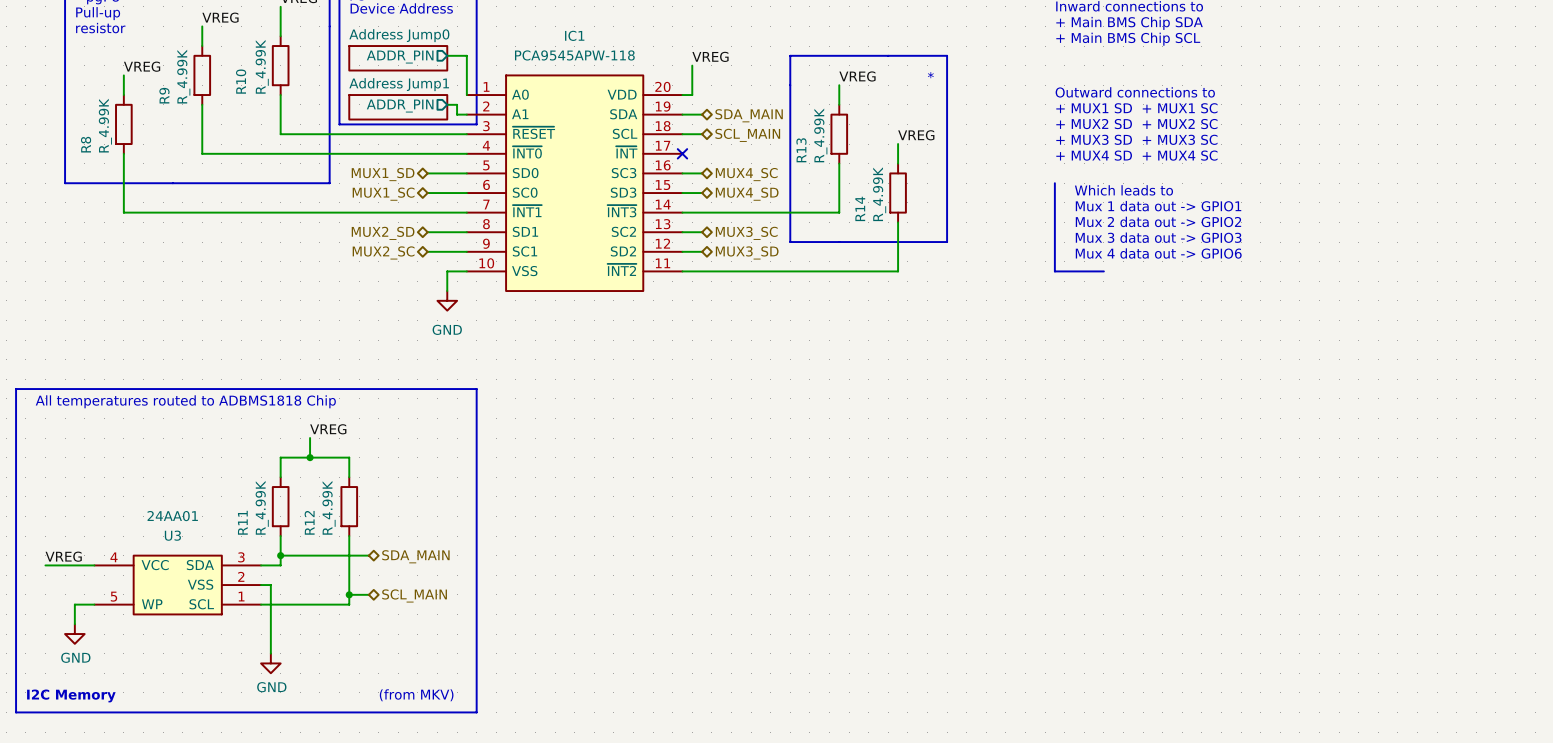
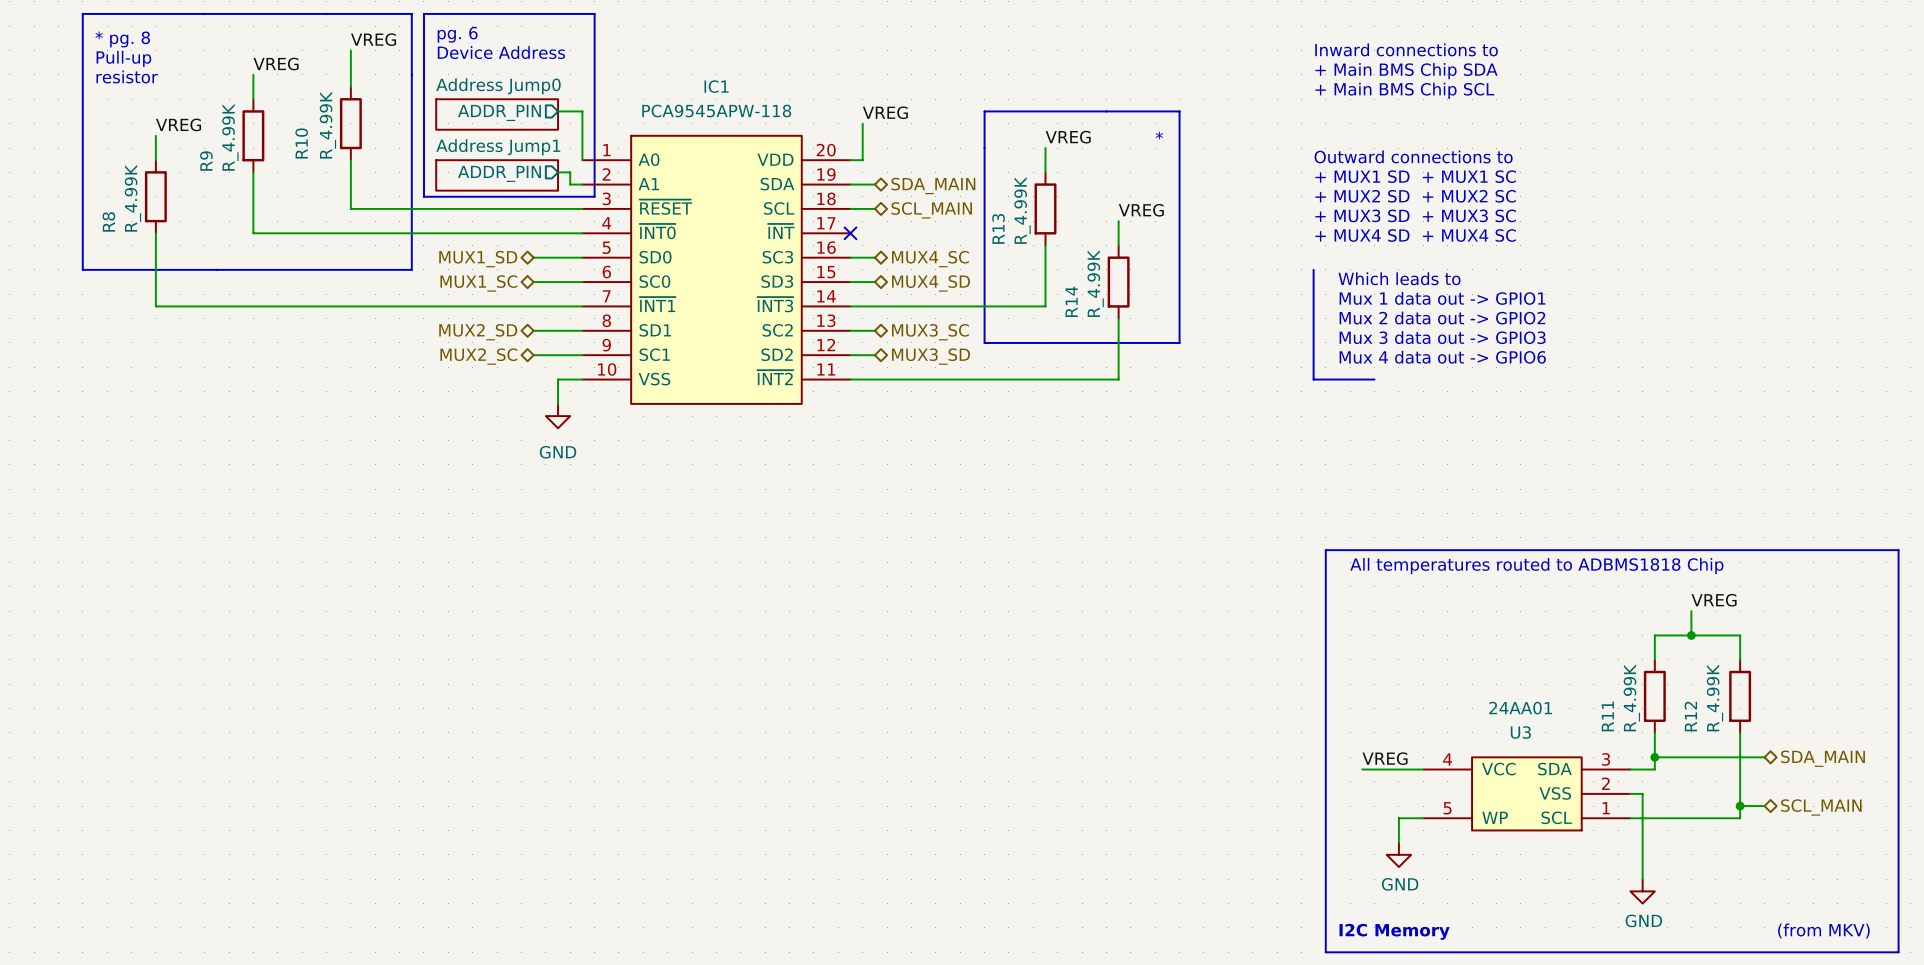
line: (16, 389) (16, 712) (476, 712) (476, 389) (16, 389) -> none
text: All temperatures routed to ADBMS1818 Chip (185, 401) -> none
line: none -> (1325, 550) (1325, 952) (1898, 952) (1898, 550) (1325, 550)
text: none -> All temperatures routed to ADBMS1818 Chip (1536, 566)
label: VREG (328, 429) -> none
wire: (310, 438) (310, 457) -> none
label: none -> VREG (1714, 600)
junction: (310, 457) -> none
wire: none -> (1691, 611) (1691, 635)
wire: (280, 477) (280, 457) (349, 457) (349, 477) -> none
junction: none -> (1691, 635)
wire: none -> (1654, 659) (1654, 635) (1740, 635) (1740, 659)
R11 position: (280, 506) -> (1654, 696)
R12 position: (349, 506) -> (1740, 696)
wire: (280, 536) (280, 565) (261, 565) -> none
wire: (349, 536) (349, 604) (261, 604) -> none
wire: (280, 555) (368, 555) -> none
junction: (280, 555) -> none
wire: none -> (1654, 732) (1654, 769) (1630, 769)
wire: none -> (1740, 732) (1740, 818) (1630, 818)
label: VREG (63, 556) -> none
hierarchical label: SDA_MAIN (415, 556) -> none
wire: (45, 565) (94, 565) -> none
wire: none -> (1654, 757) (1764, 757)
junction: none -> (1654, 757)
label: none -> VREG (1385, 758)
hierarchical label: none -> SDA_MAIN (1823, 758)
U3 position: (177, 585) -> (1526, 793)
wire: (261, 585) (270, 585) (270, 653) -> none
wire: none -> (1362, 769) (1423, 769)
wire: (349, 594) (368, 594) -> none
junction: (349, 594) -> none
hierarchical label: SCL_MAIN (414, 595) -> none
wire: (94, 604) (74, 604) (74, 624) -> none
wire: none -> (1630, 793) (1642, 793) (1642, 879)
wire: none -> (1740, 806) (1764, 806)
junction: none -> (1740, 806)
hierarchical label: none -> SCL_MAIN (1821, 807)
wire: none -> (1423, 818) (1398, 818) (1398, 842)
power symbol: GND (74, 634) -> none
power symbol: none -> GND (1398, 854)
power symbol: GND (270, 663) -> none
power symbol: none -> GND (1642, 891)
text: I2C Memory (71, 695) -> none
text: (from MKV) (416, 695) -> none
text: none -> (from MKV) (1823, 930)
text: none -> I2C Memory (1394, 931)

